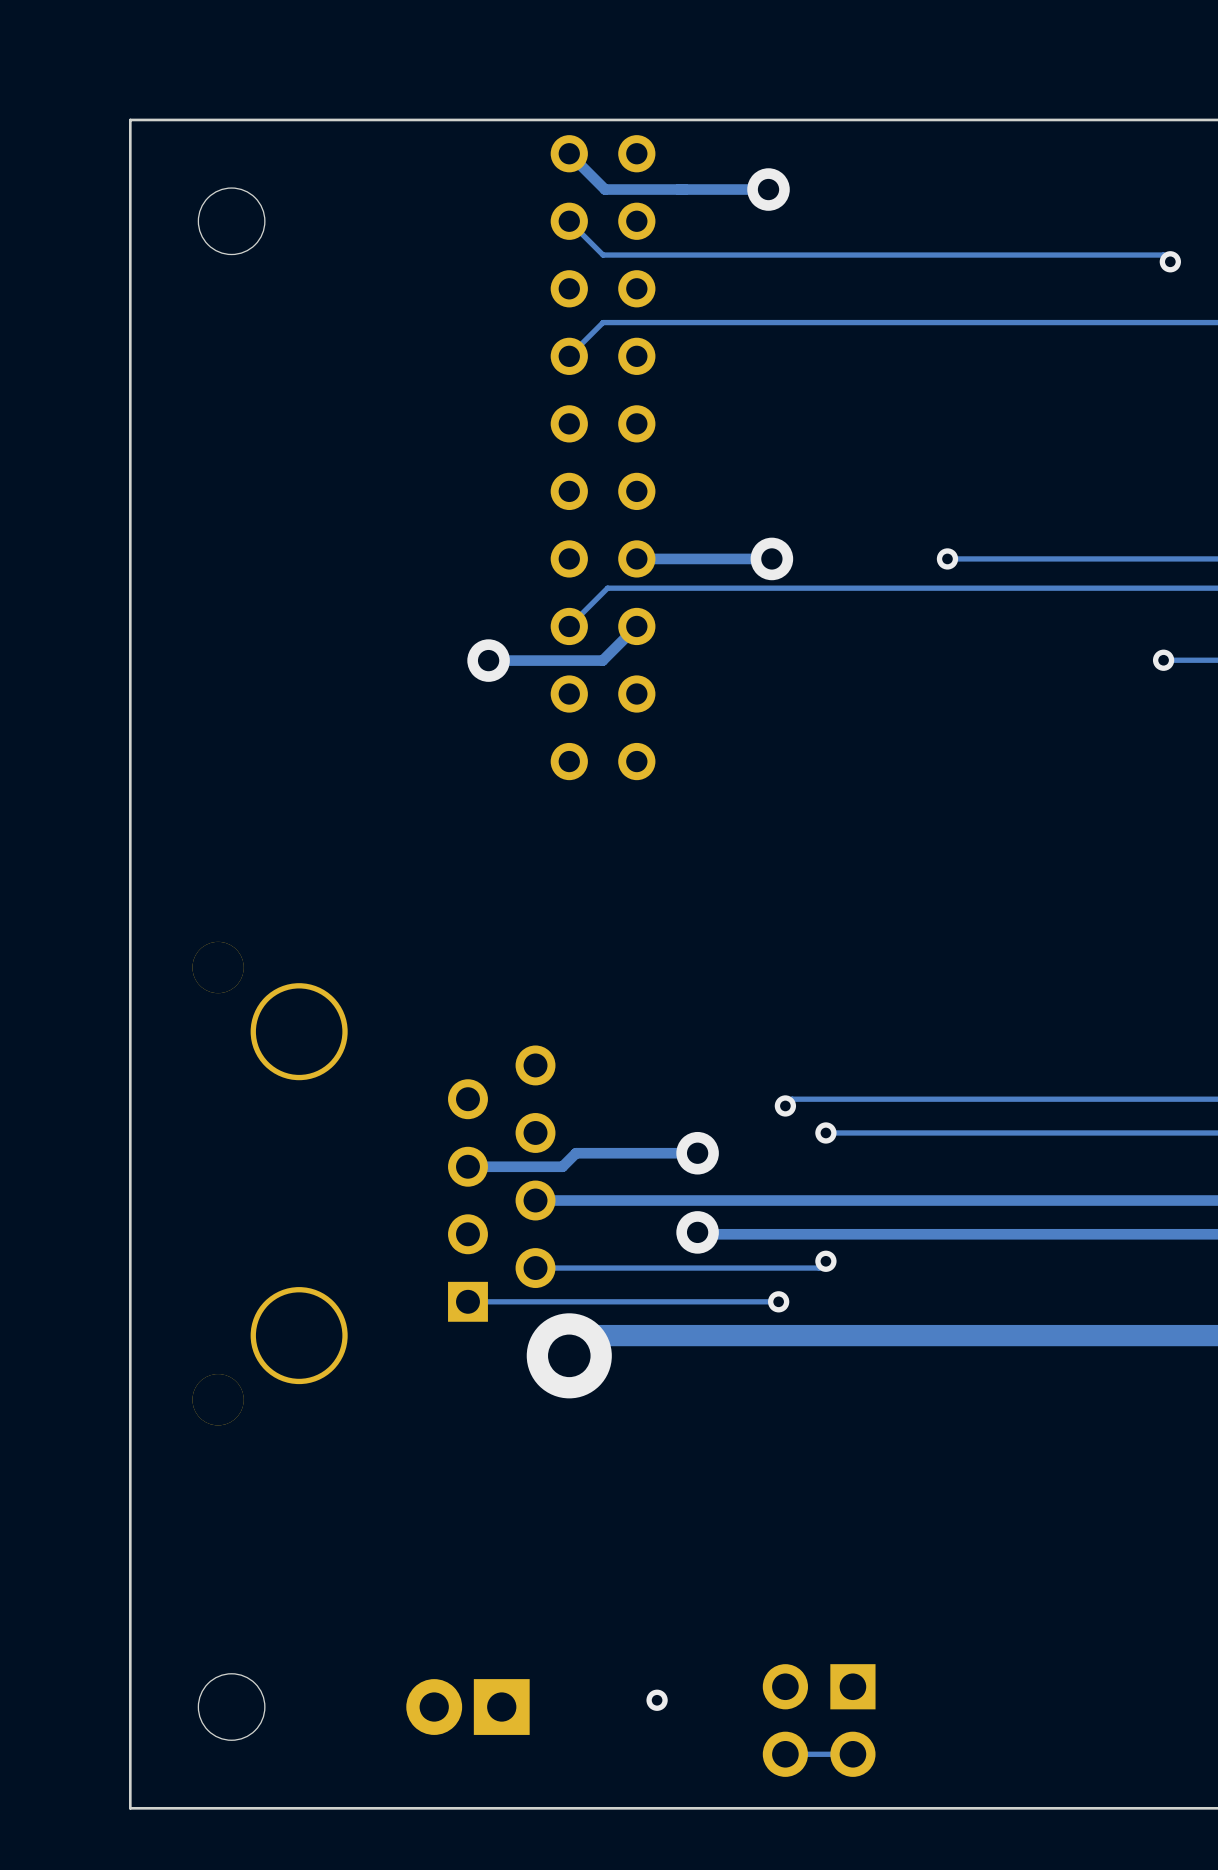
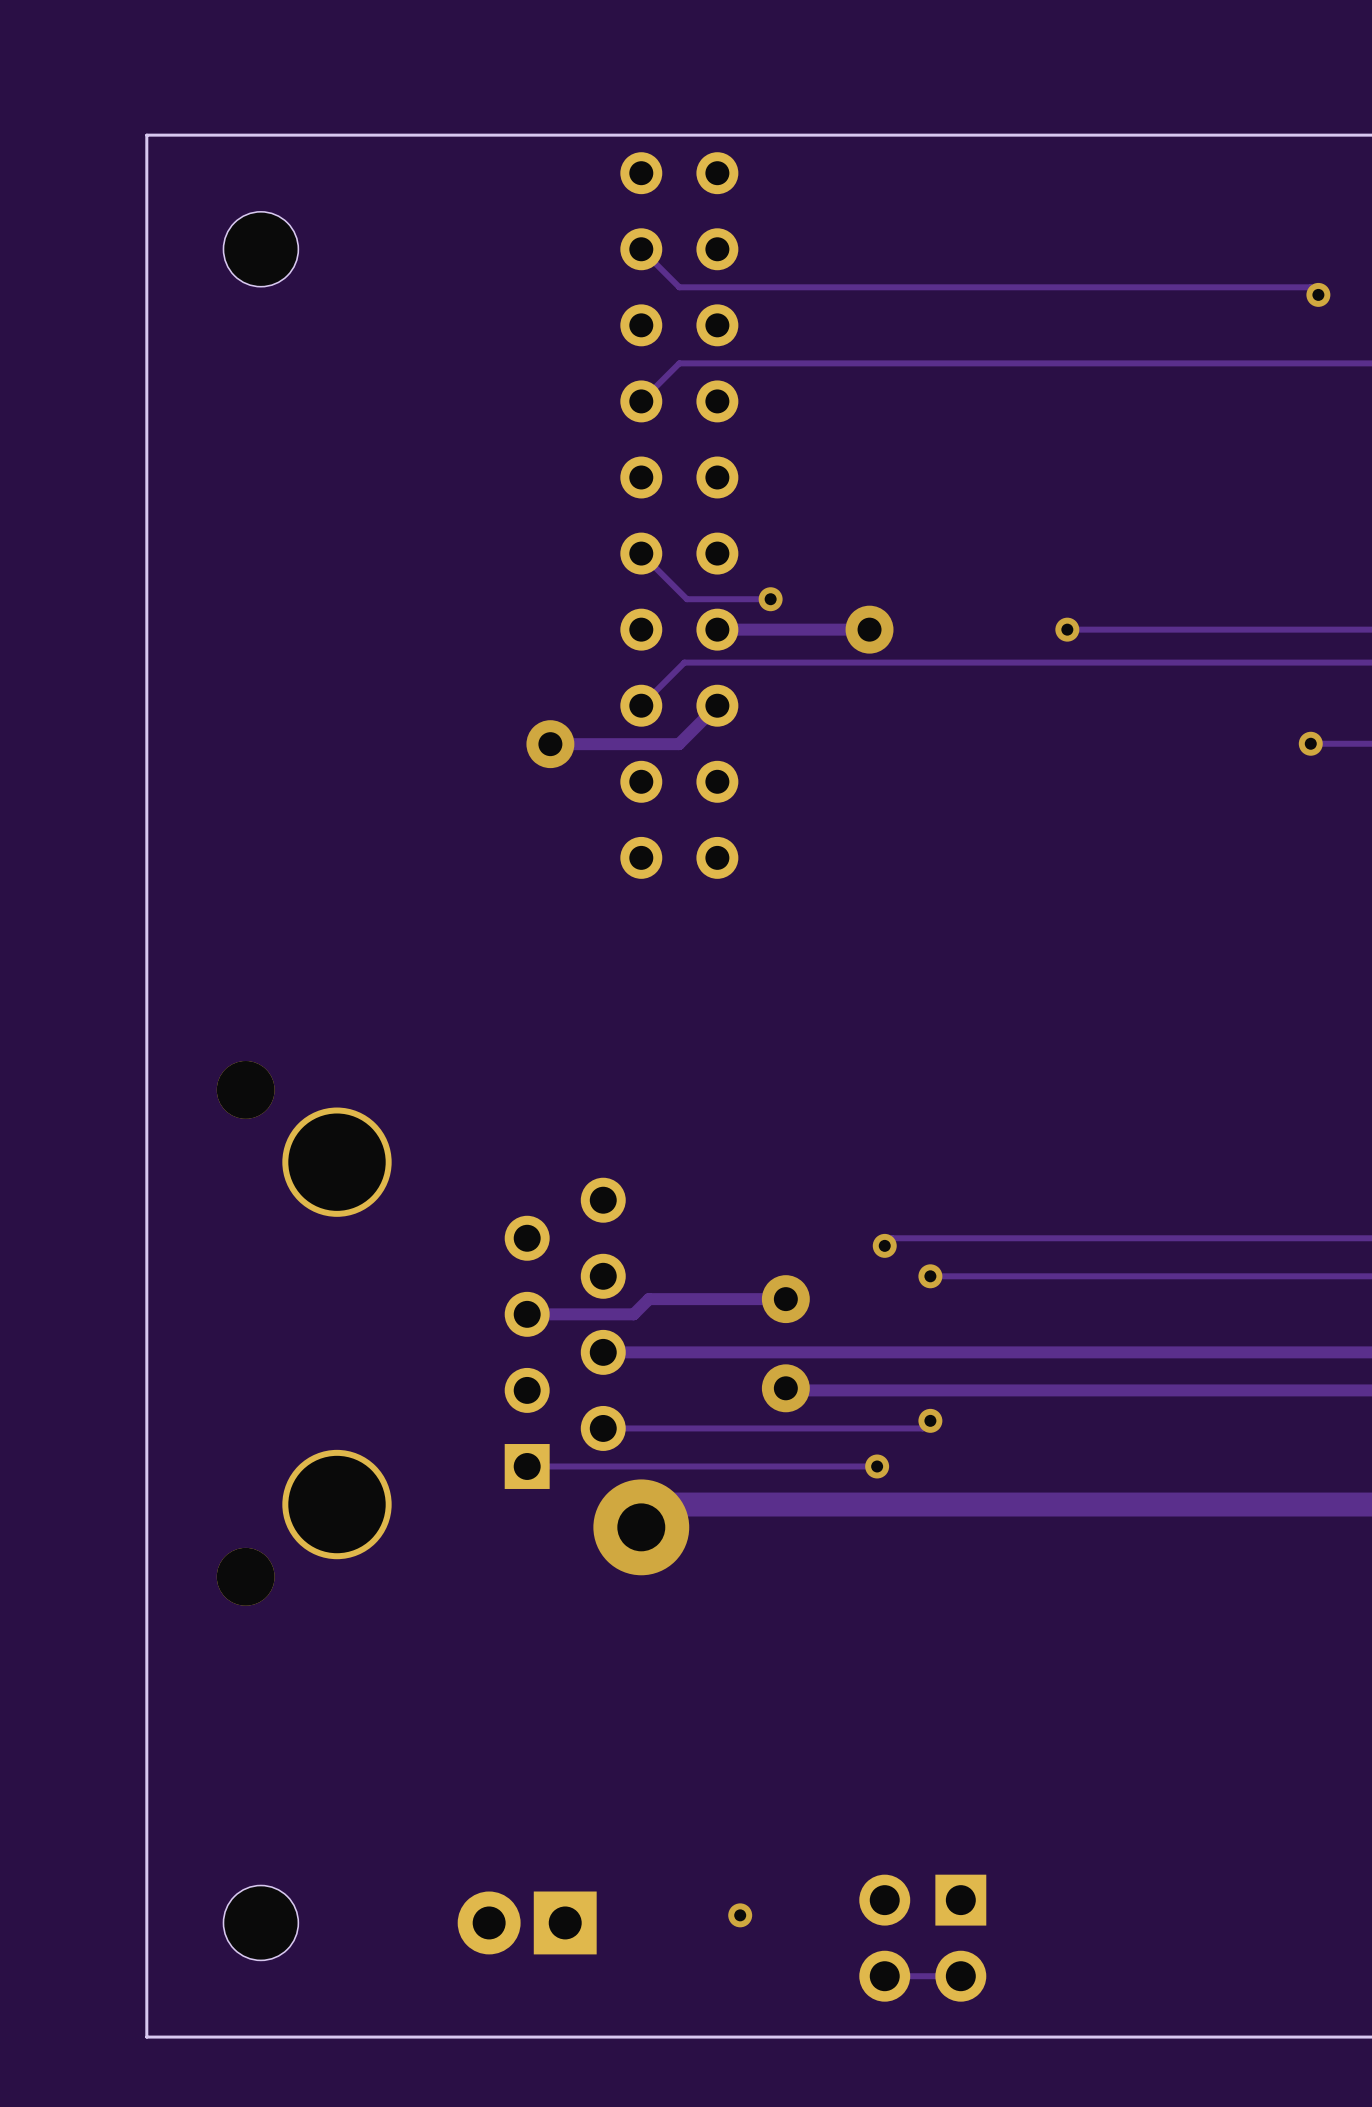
track: (569, 153) (605, 189) (768, 189) -> none
via: (768, 189) -> none
track: none -> (641, 553) (686, 599) (770, 599)
via: none -> (770, 599)

